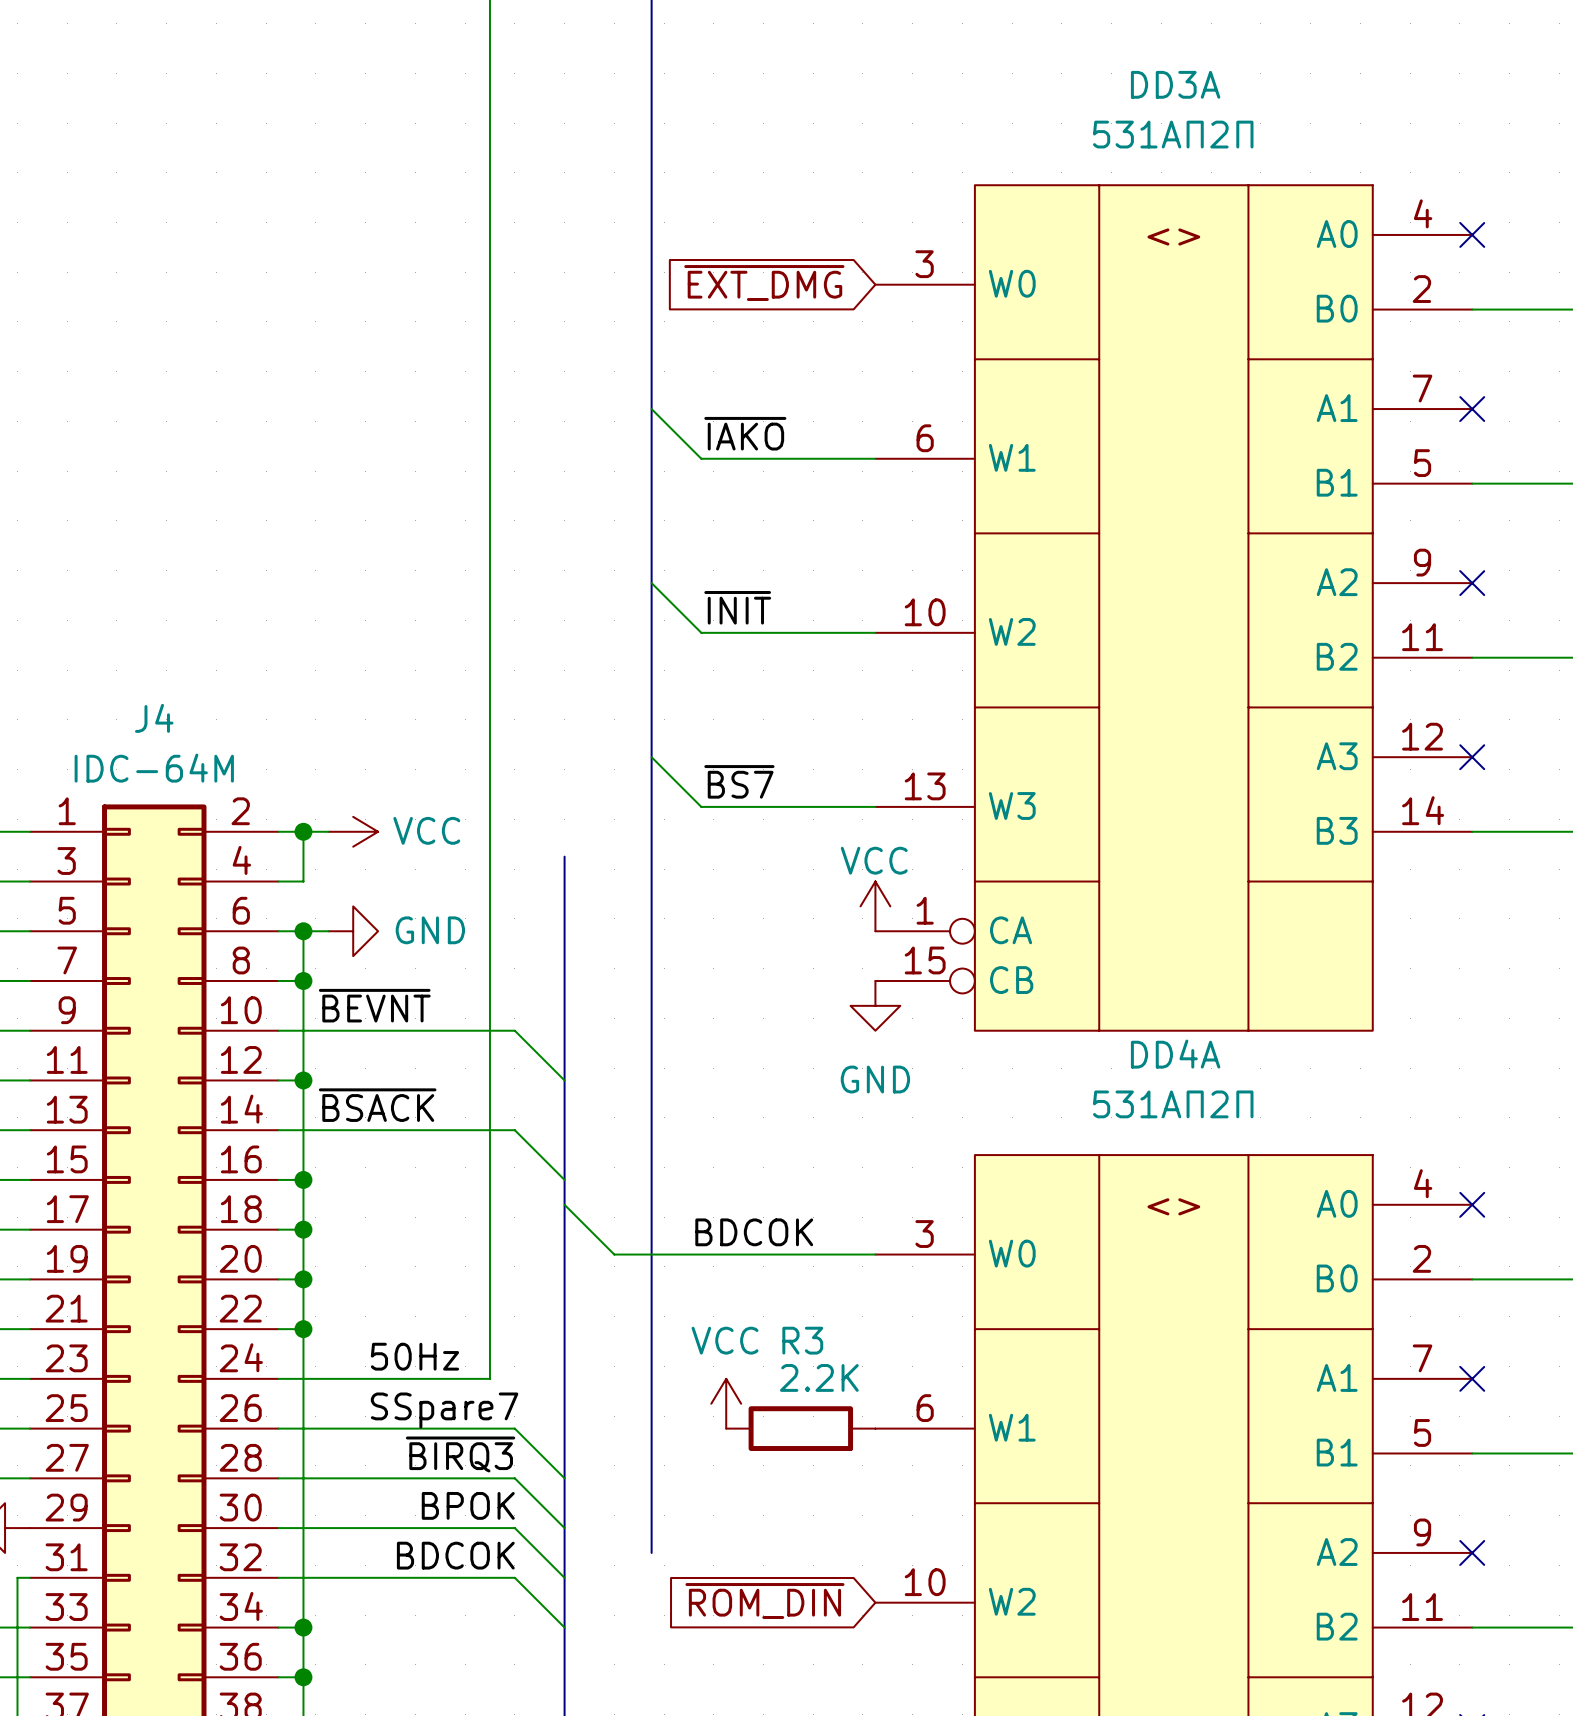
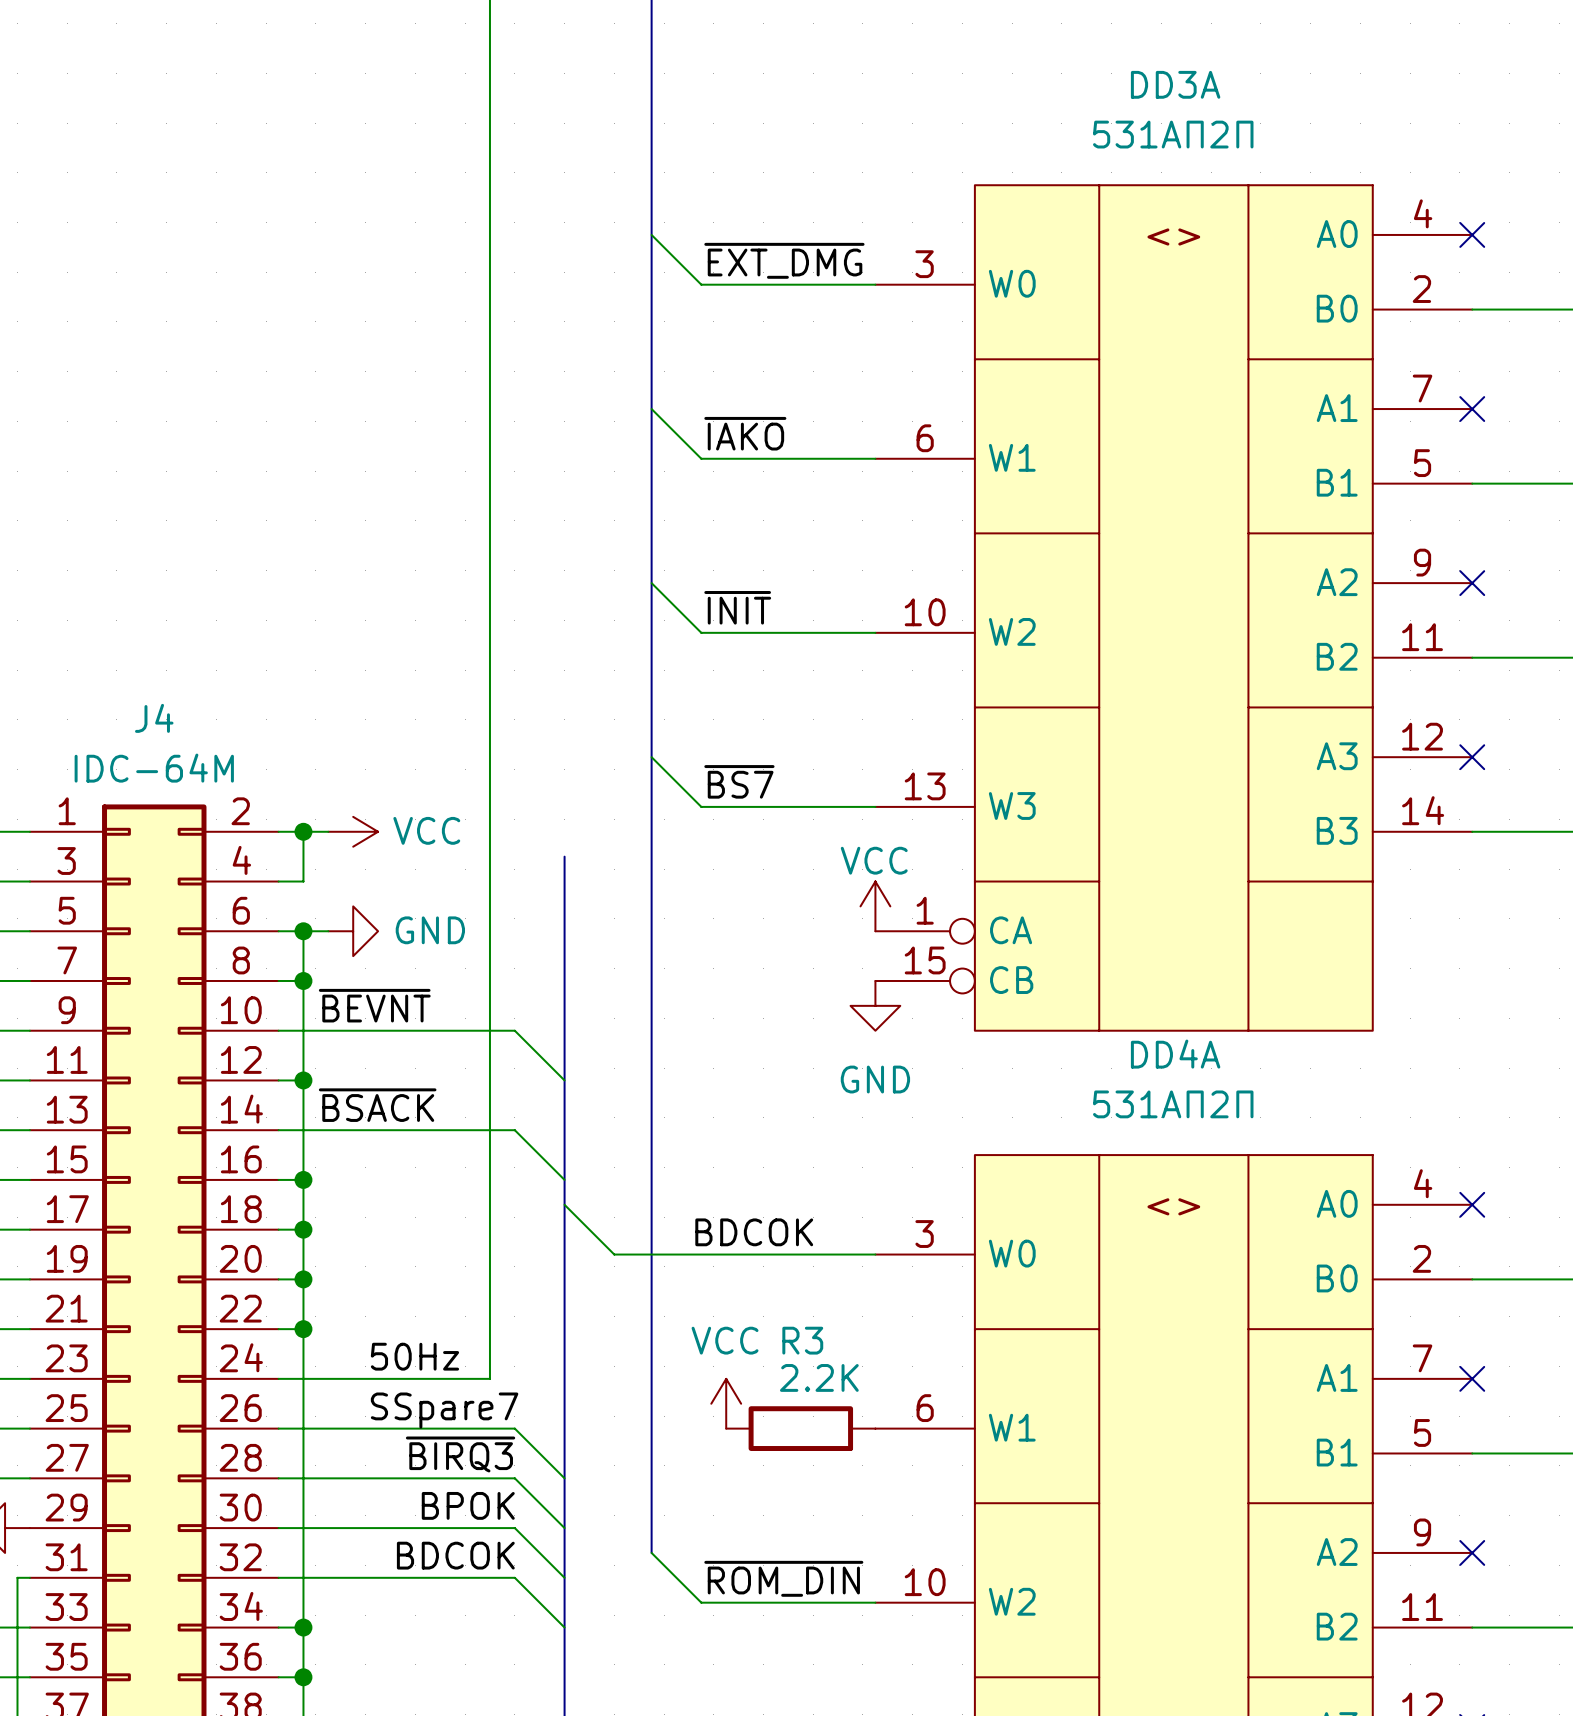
wire: none -> (651, 234) (701, 284) (875, 284)
label: none -> ~{EXT_DMG} (784, 260)
global label: ~{EXT_DMG} (764, 283) -> none
wire: none -> (651, 1552) (701, 1602) (875, 1602)
label: none -> ~{ROM_DIN} (783, 1578)
global label: ~{ROM_DIN} (764, 1601) -> none

